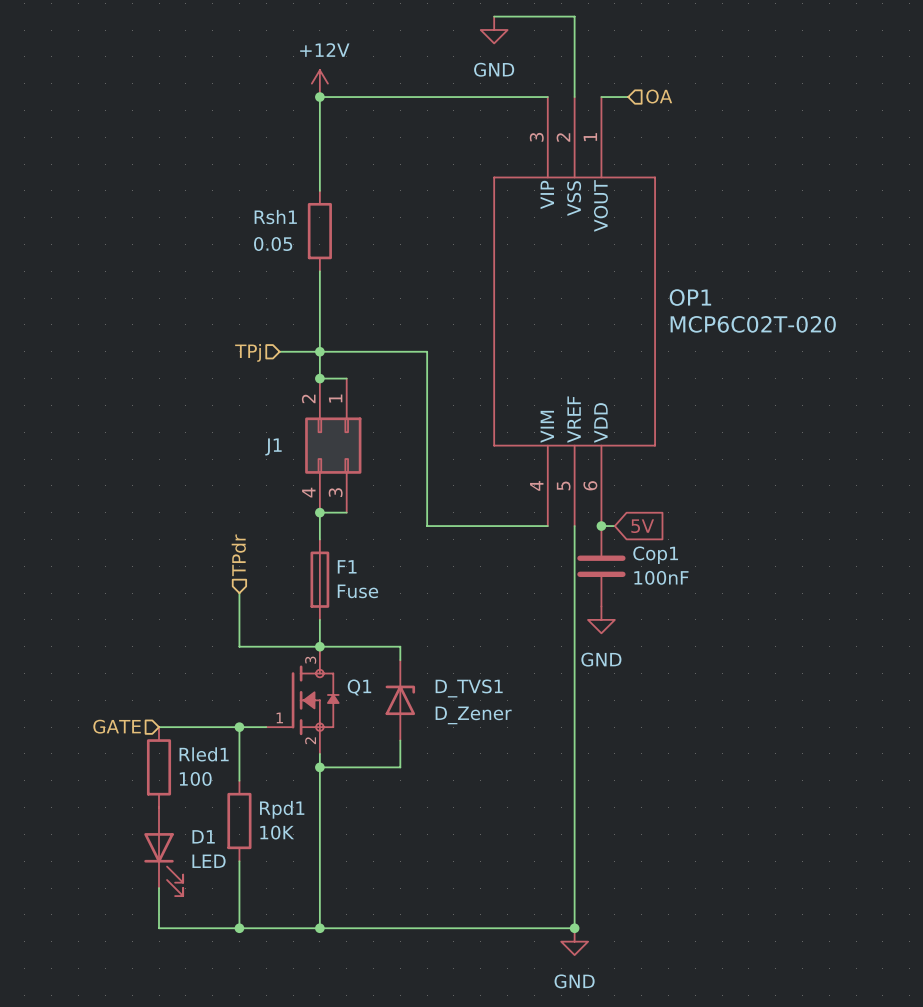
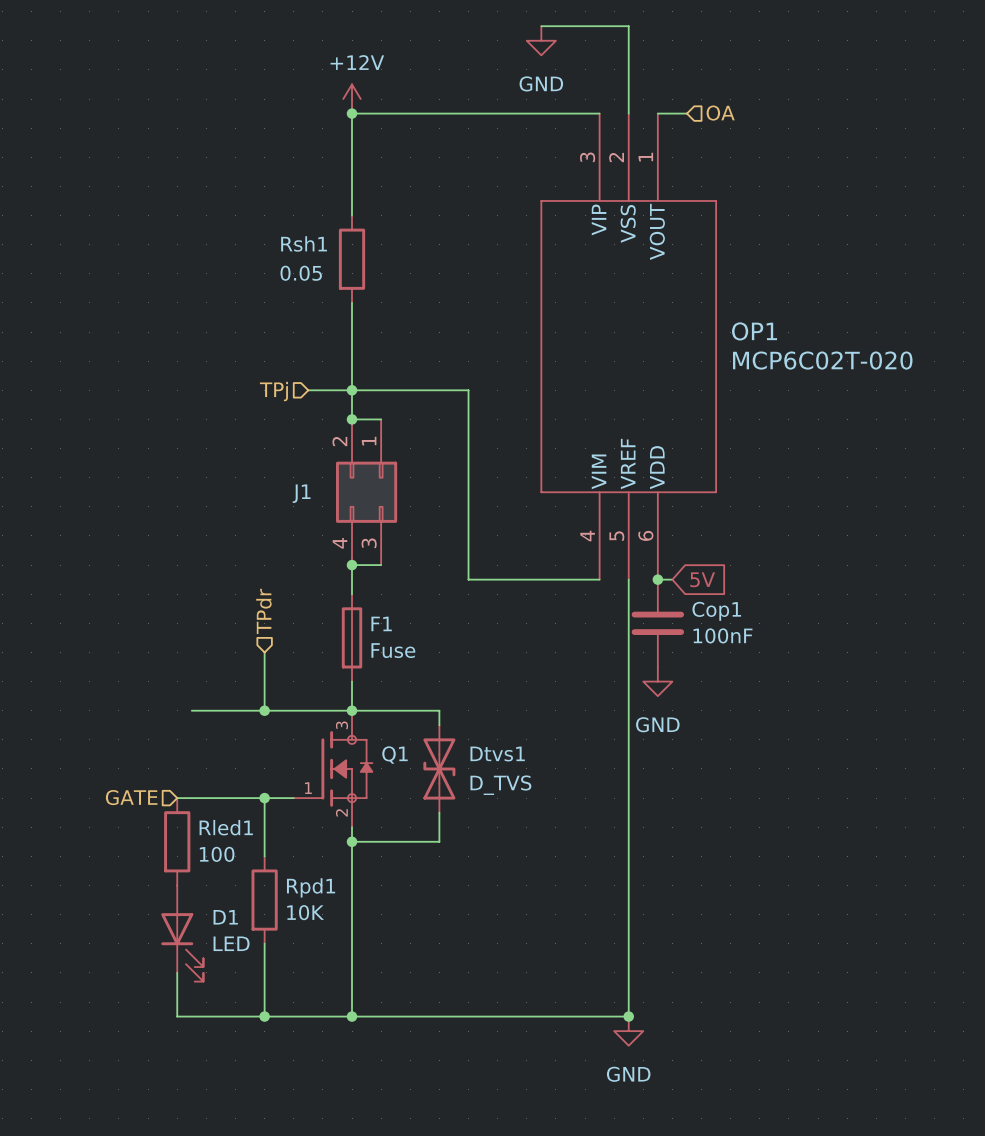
wire: none -> (191, 710) (264, 710)
junction: none -> (264, 710)
D_TVS1: D_Zener (400, 700) -> none
Dtvs1: none -> D_TVS (439, 768)

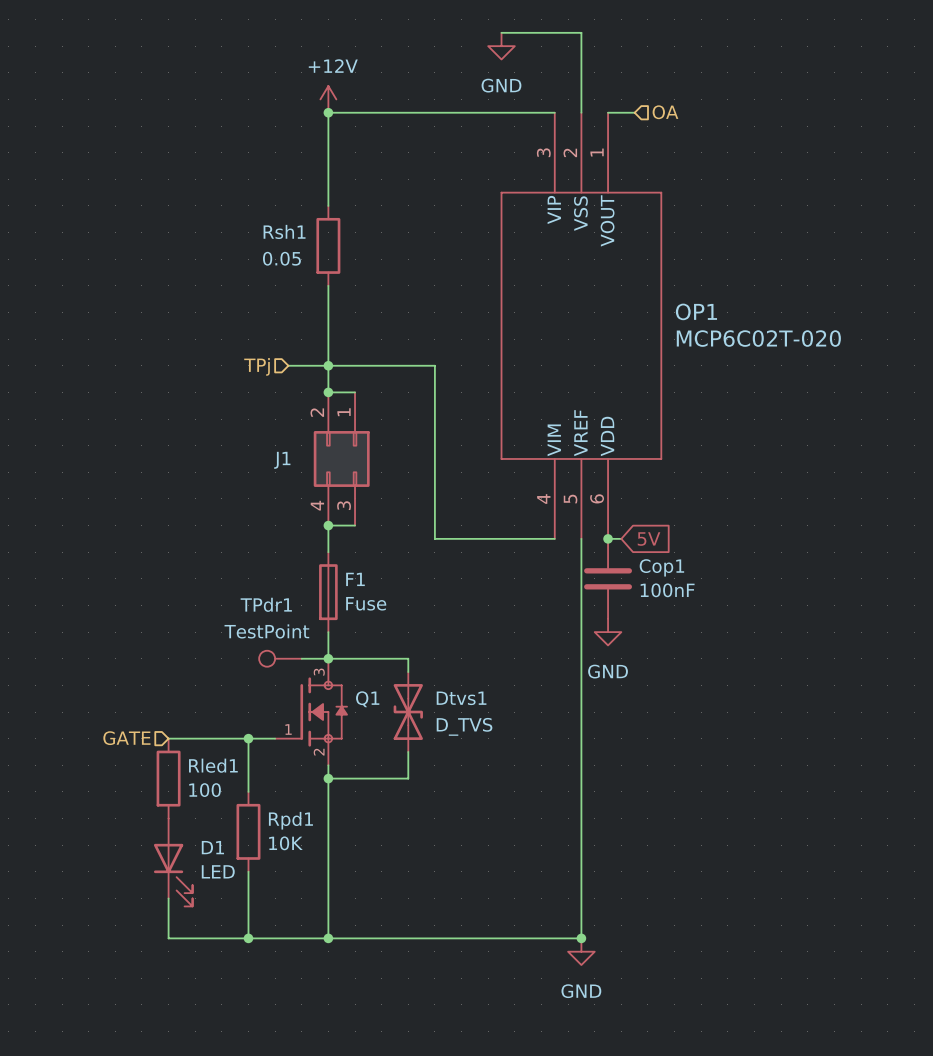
hierarchical label: TPdr (263, 611) -> none
wire: (264, 652) (264, 710) -> none
wire: (191, 710) (322, 710) -> none
junction: (264, 710) -> none
TPdr1: none -> TestPoint (280, 658)

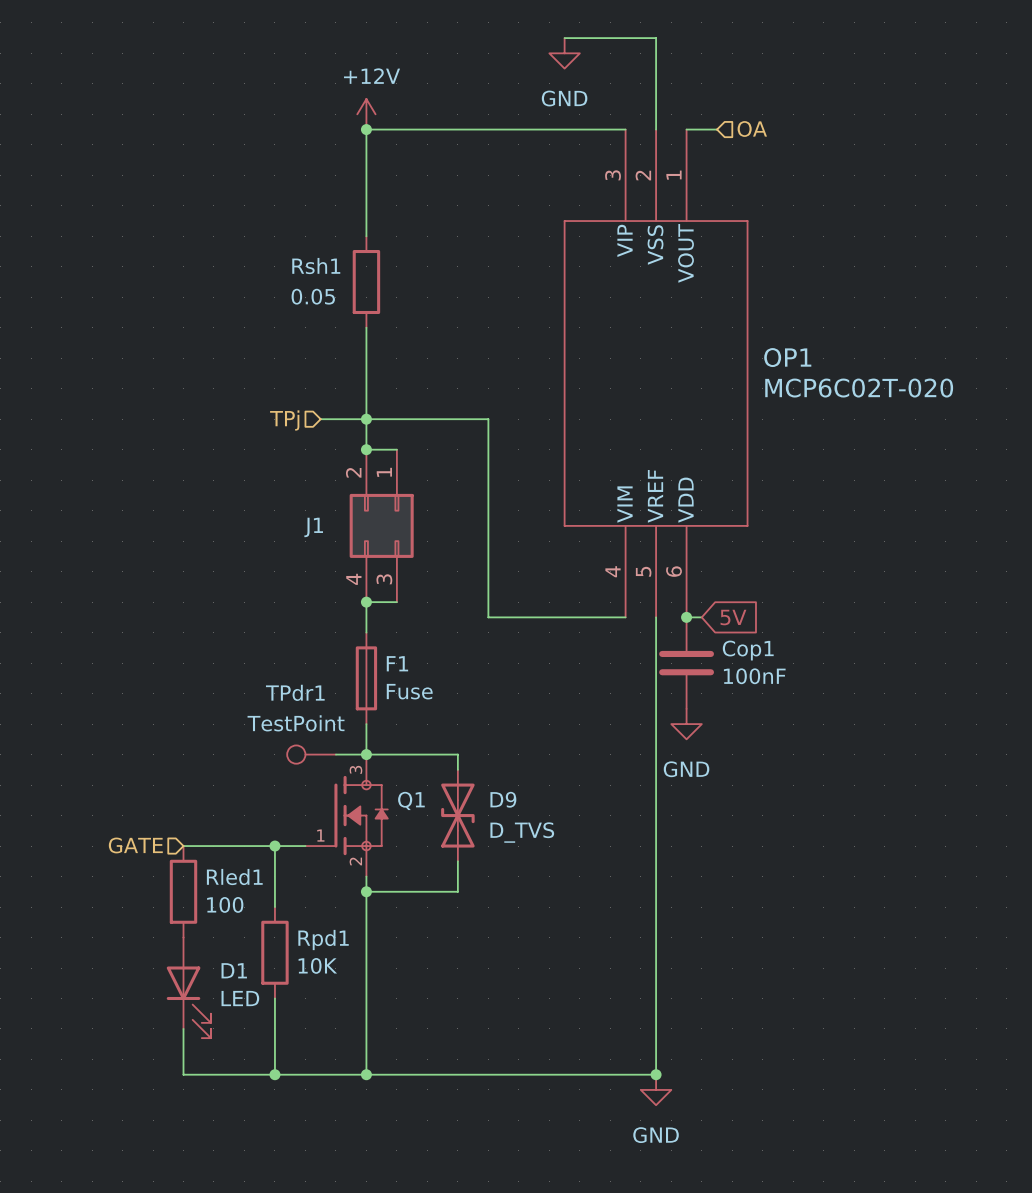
Dtvs1 name: Dtvs1 (461, 698) -> D9 (503, 799)

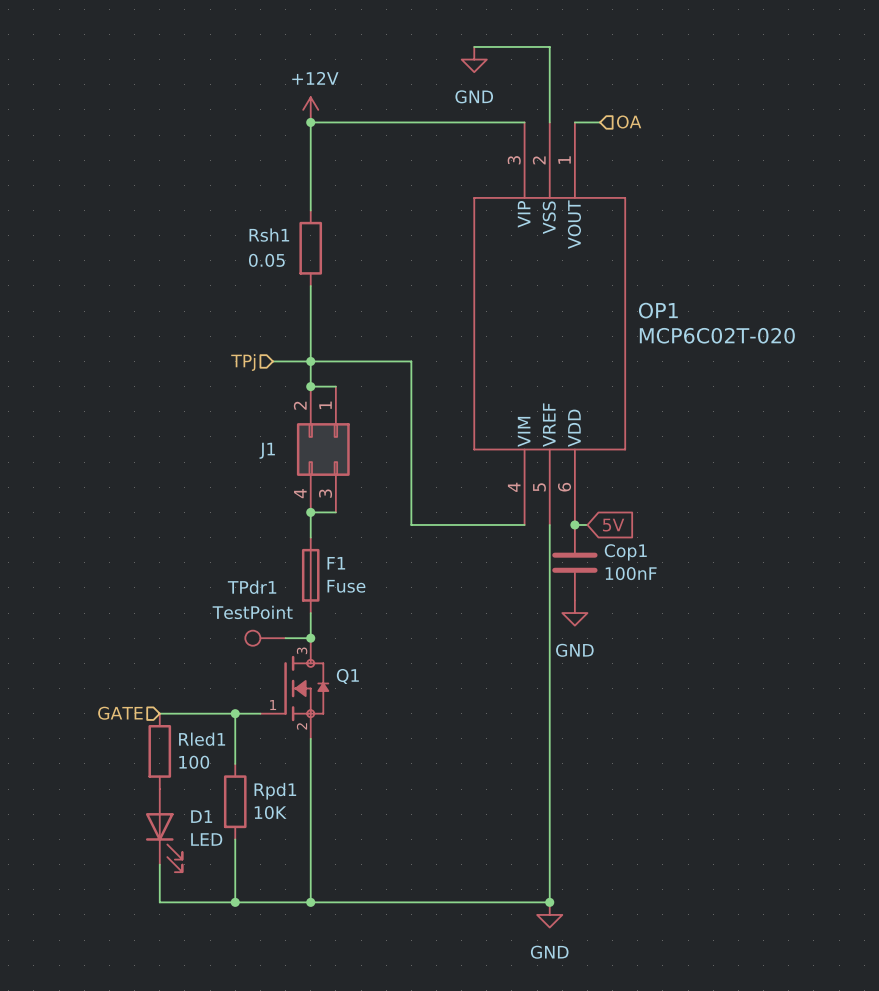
wire: (366, 754) (457, 754) (457, 769) -> none
D9: D_TVS (457, 815) -> none
wire: (457, 861) (457, 891) (366, 891) -> none
junction: (366, 891) -> none

